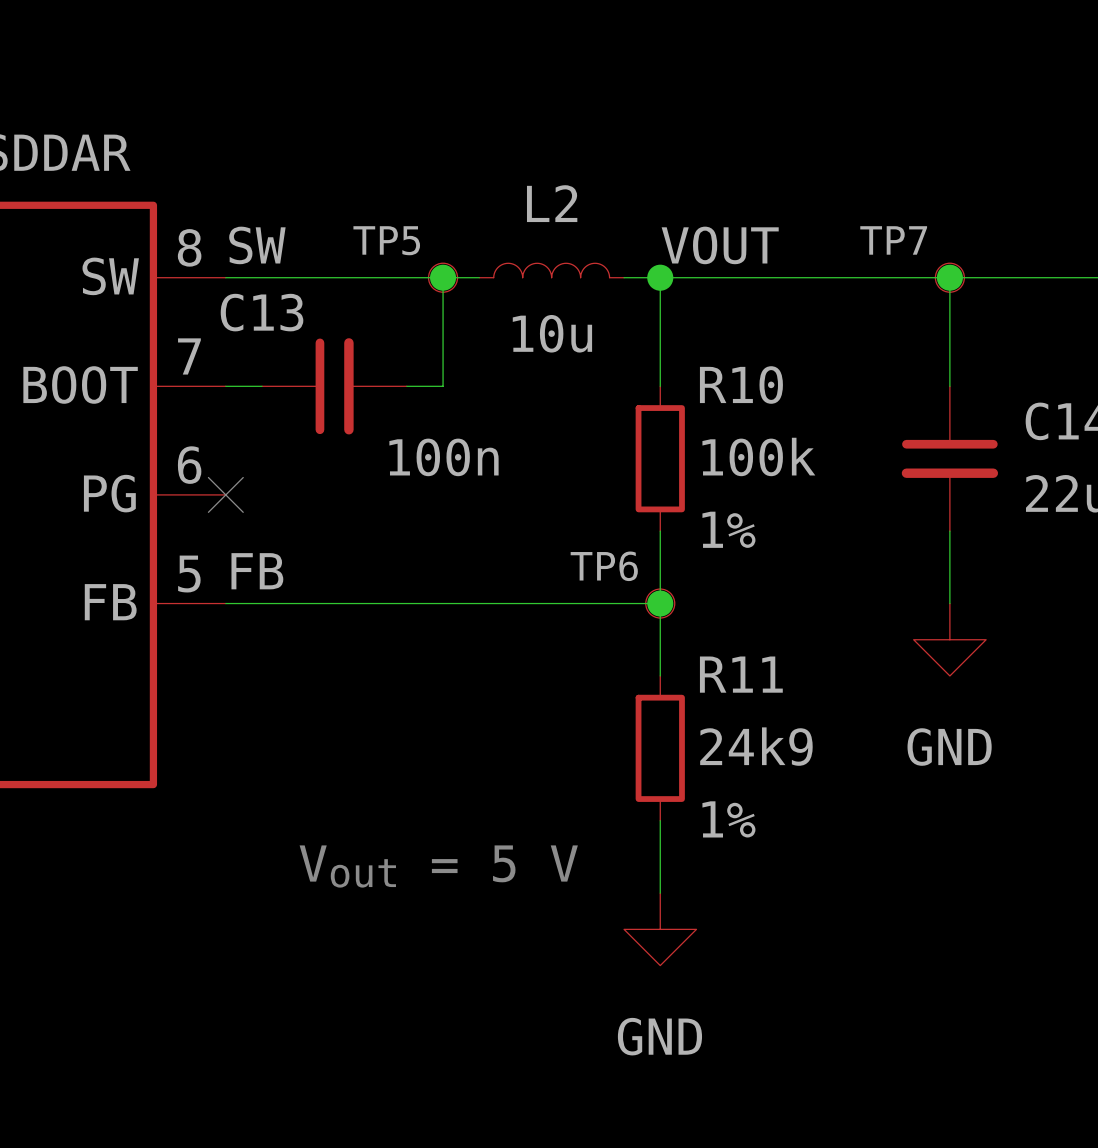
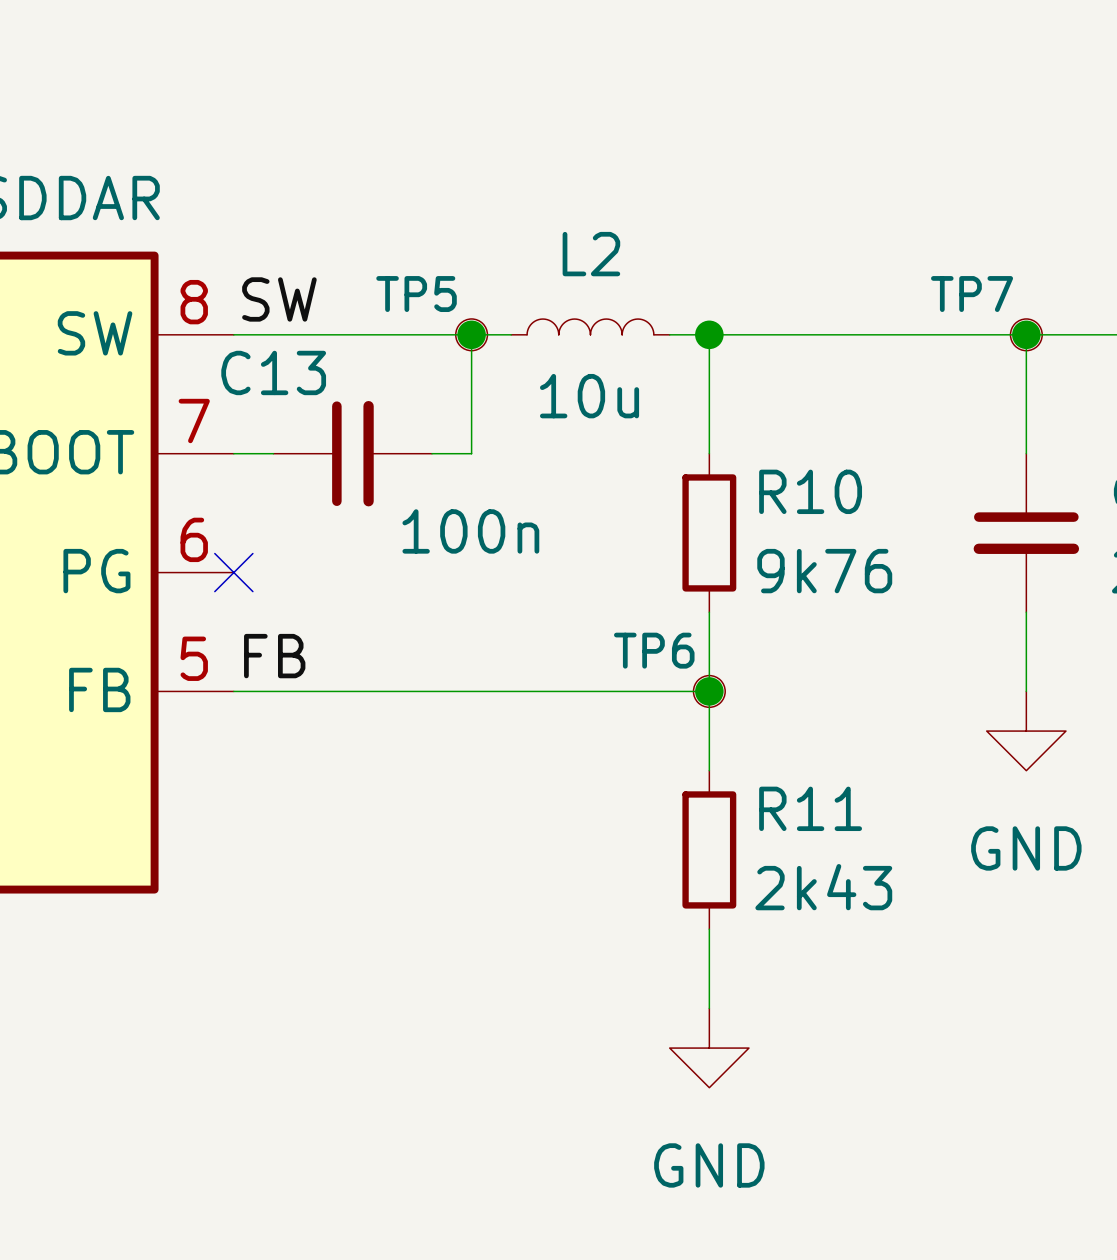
label: VOUT (720, 245) -> none
R10 name position: R10 (741, 384) -> R10 (810, 491)
R10 value: 100k (758, 456) -> 9k76 (824, 571)
R10 text: 1% (728, 529) -> none
R11 name position: R11 (741, 674) -> R11 (810, 808)
R11 value: 24k9 (756, 746) -> 2k43 (823, 887)
R11 text: 1% (728, 819) -> none
text: Vout = 5 V (438, 866) -> none

